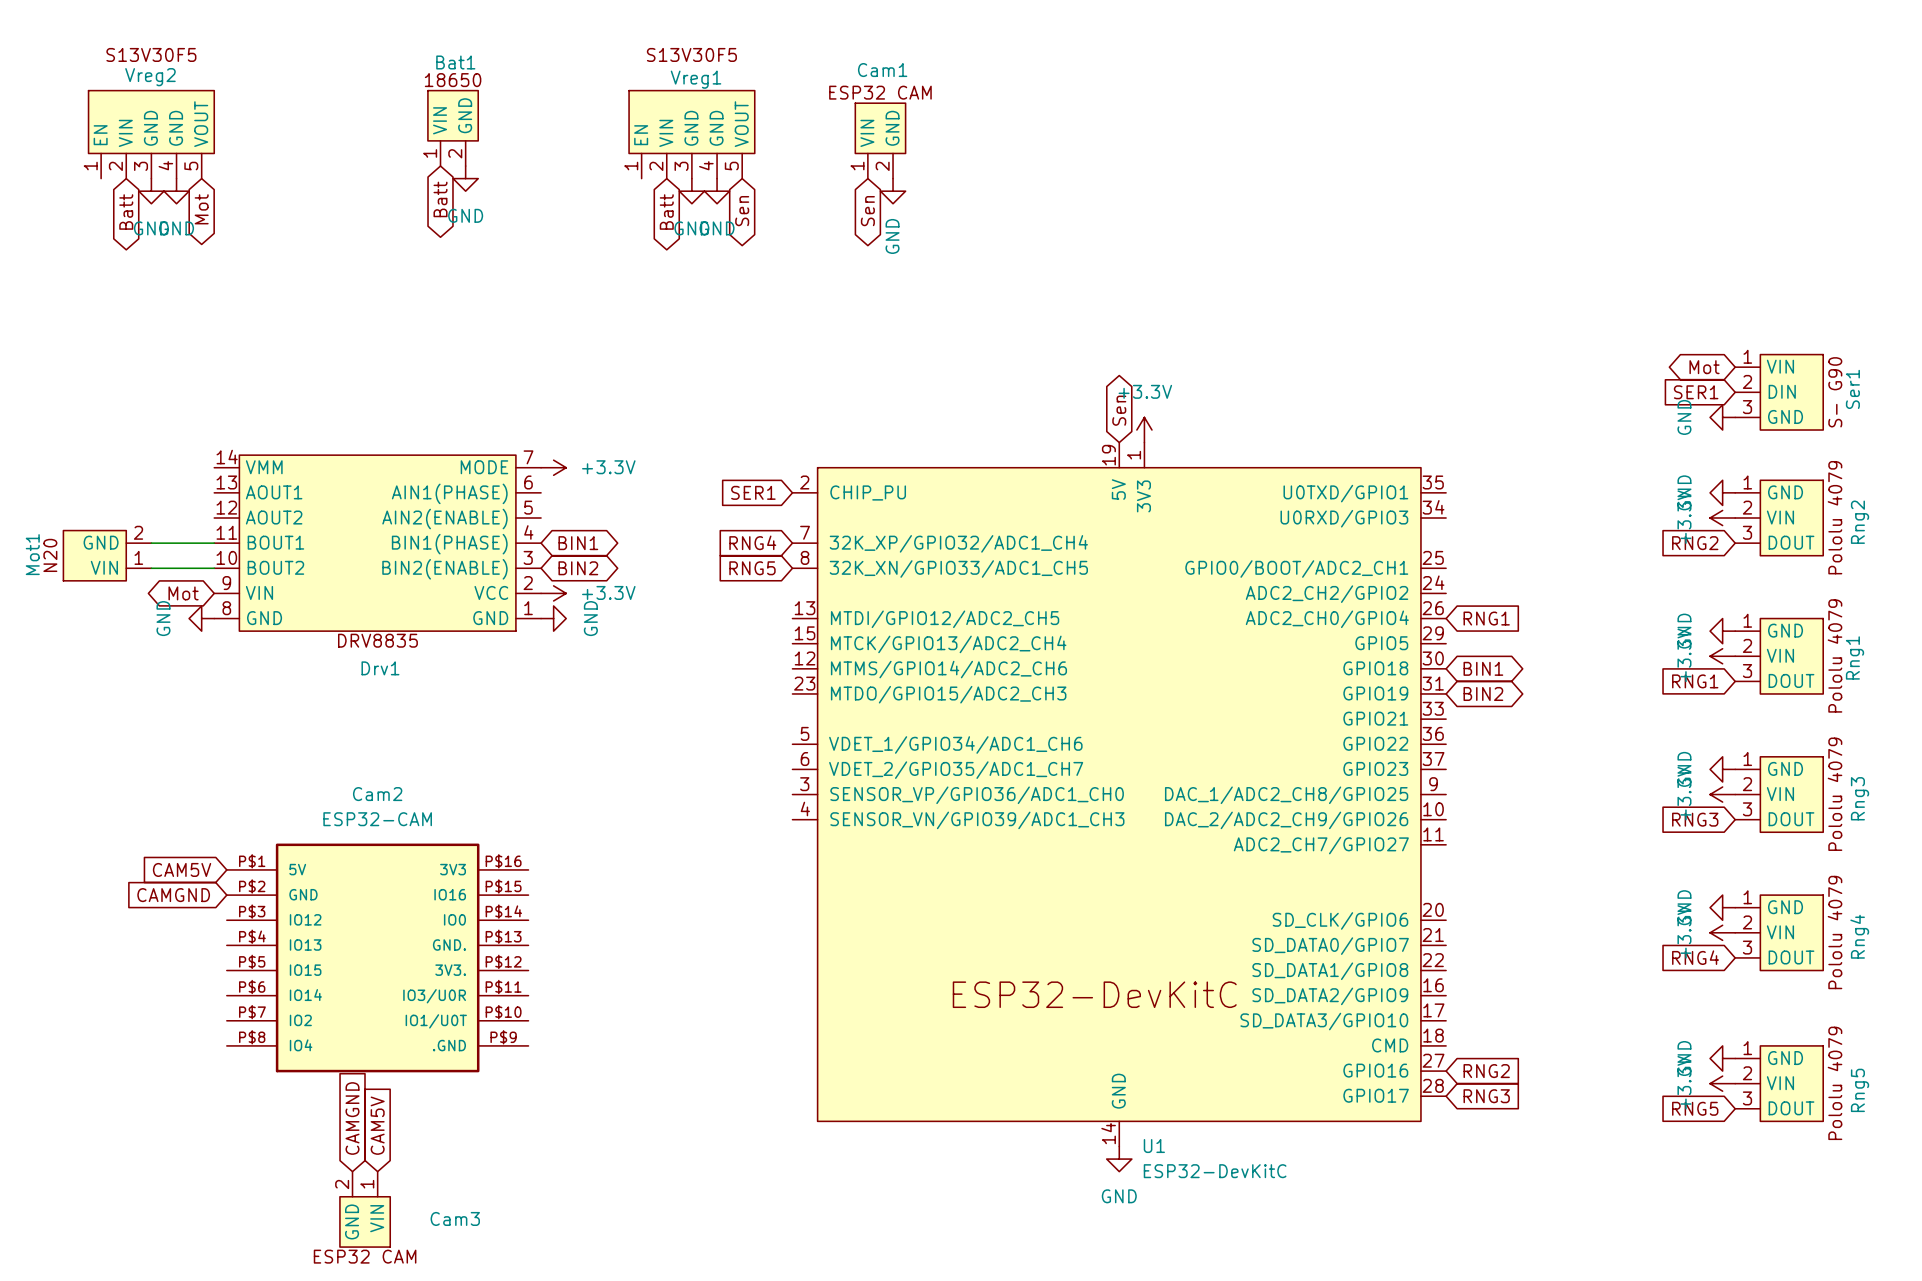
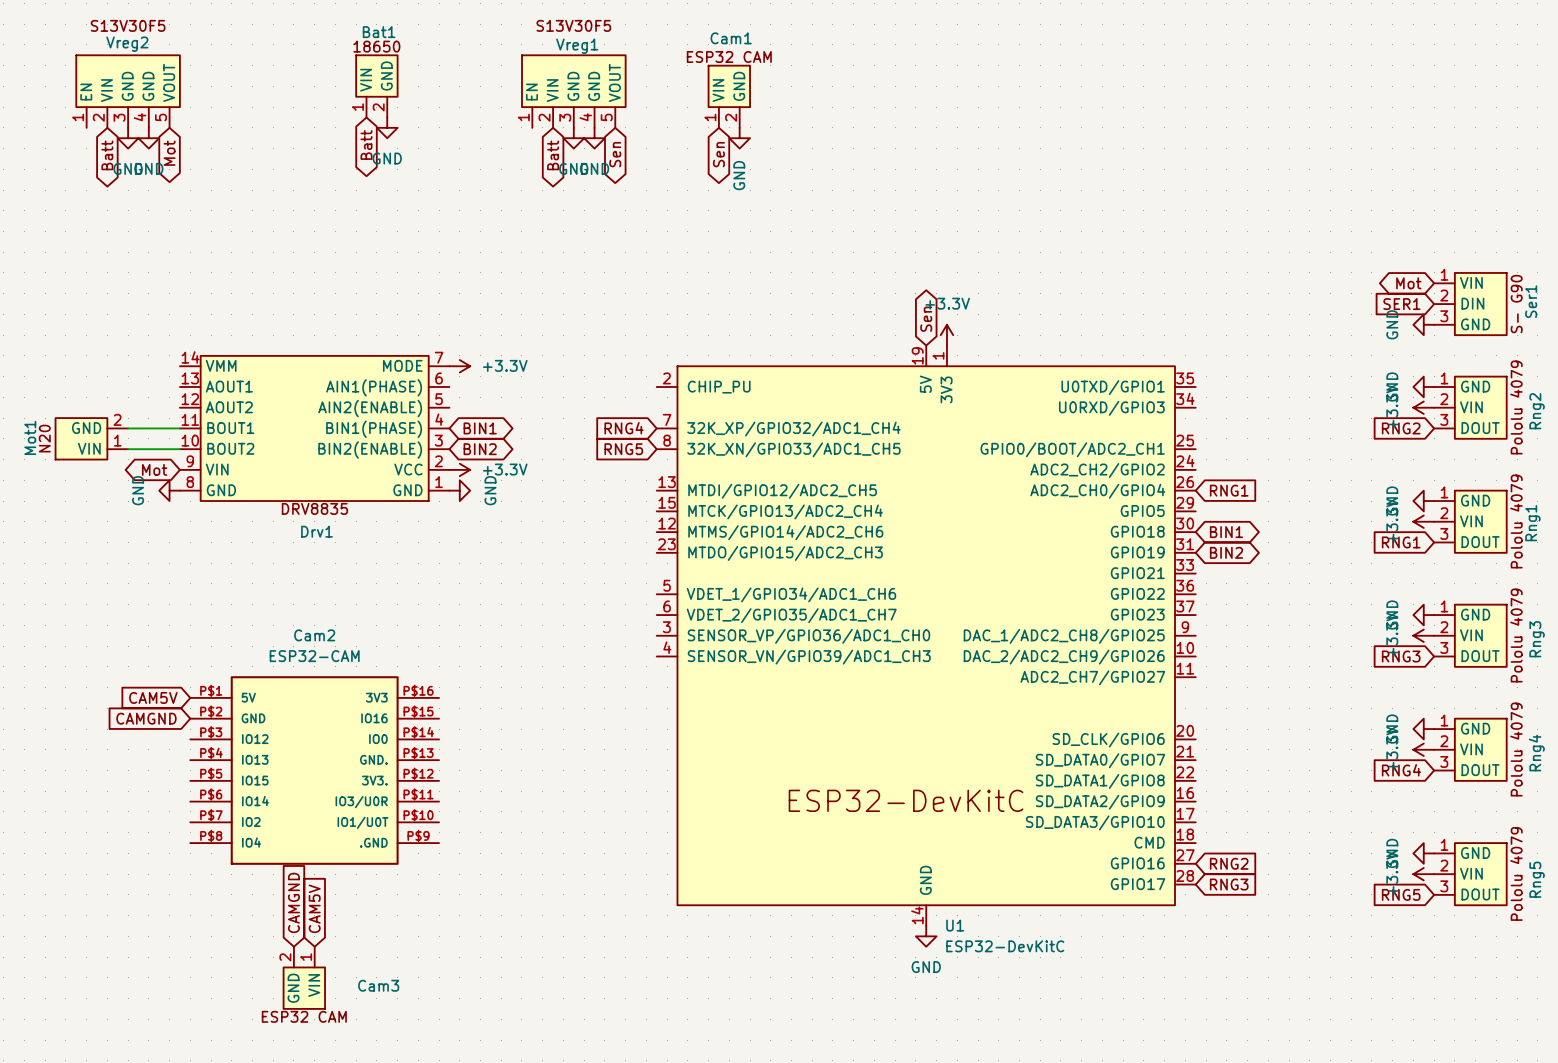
global label: SER1 (753, 492) -> none

